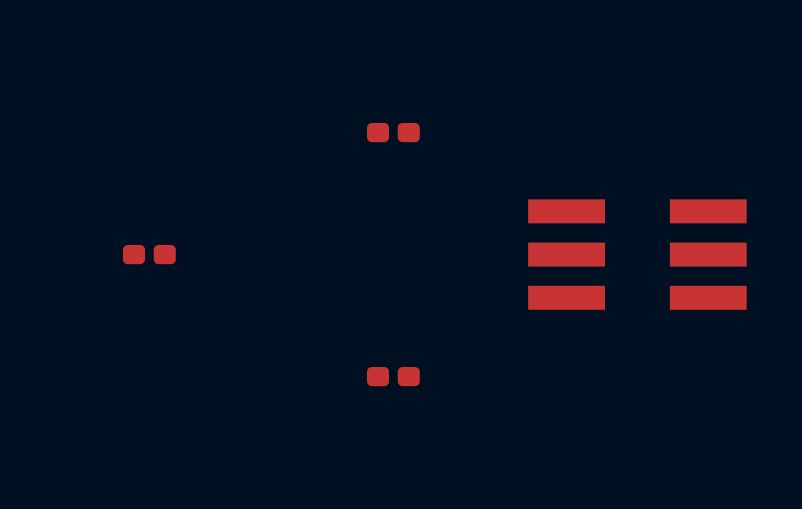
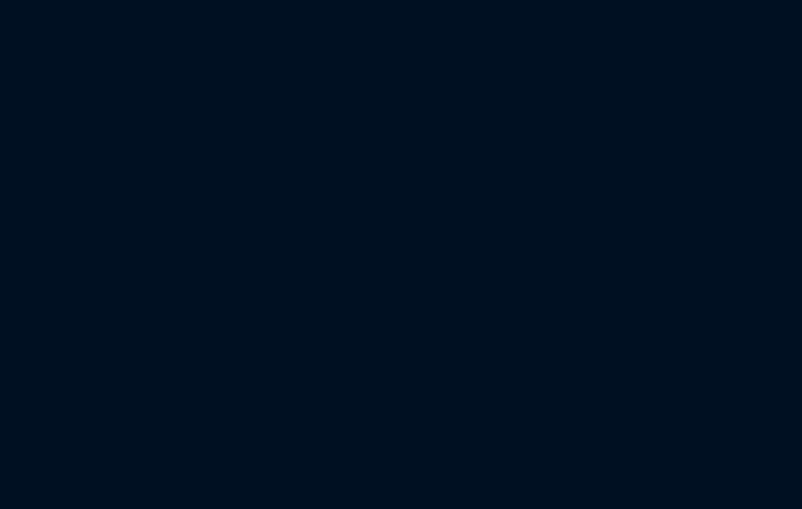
part: (393, 132) -> none
part: (149, 254) -> none
part: (637, 254) -> none
part: (393, 376) -> none

